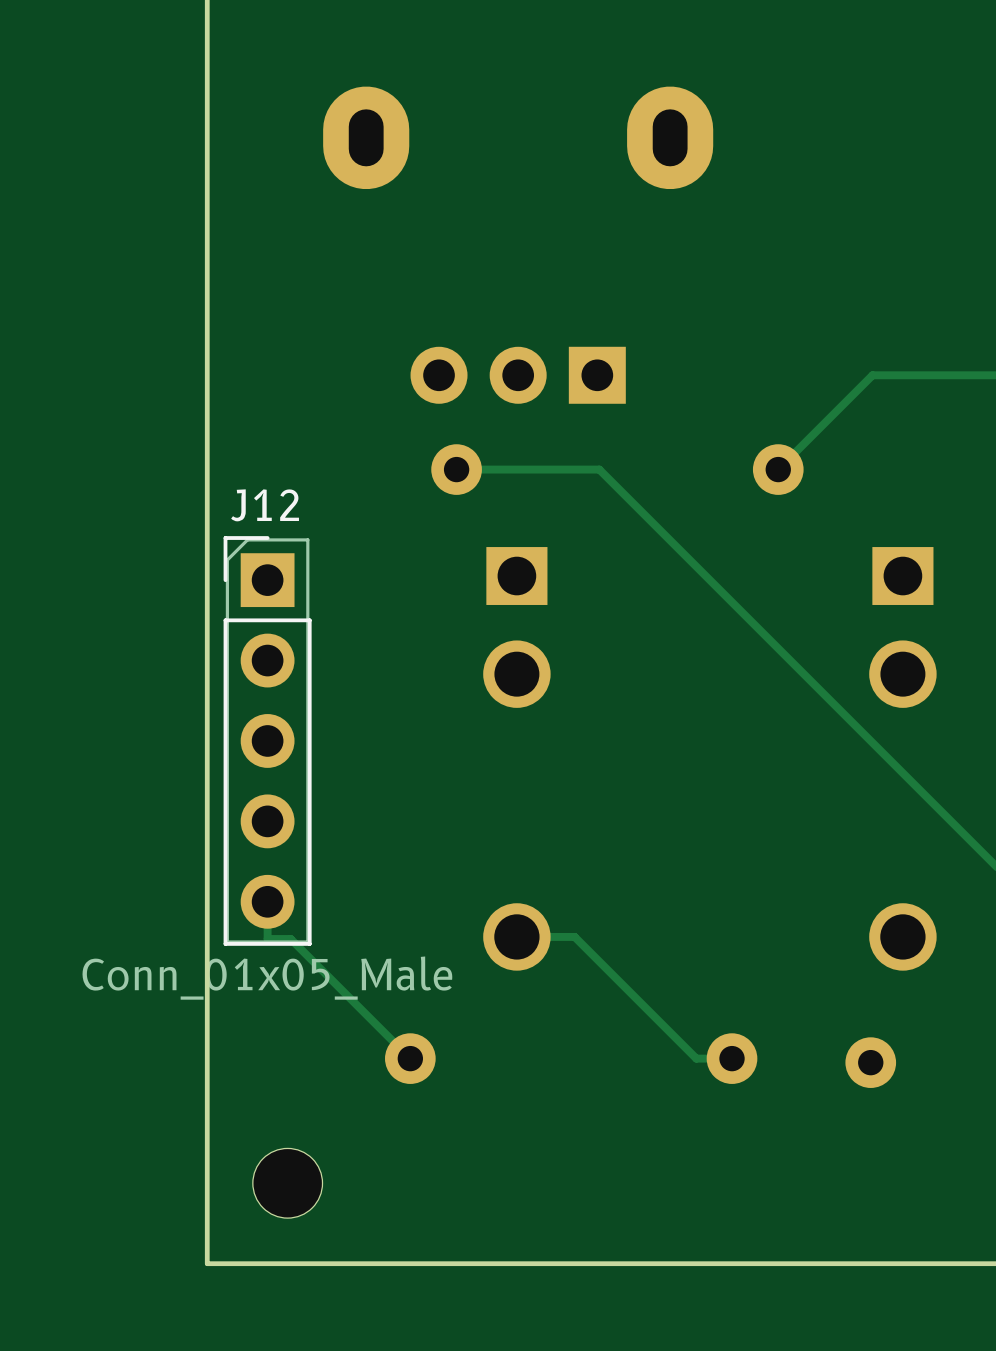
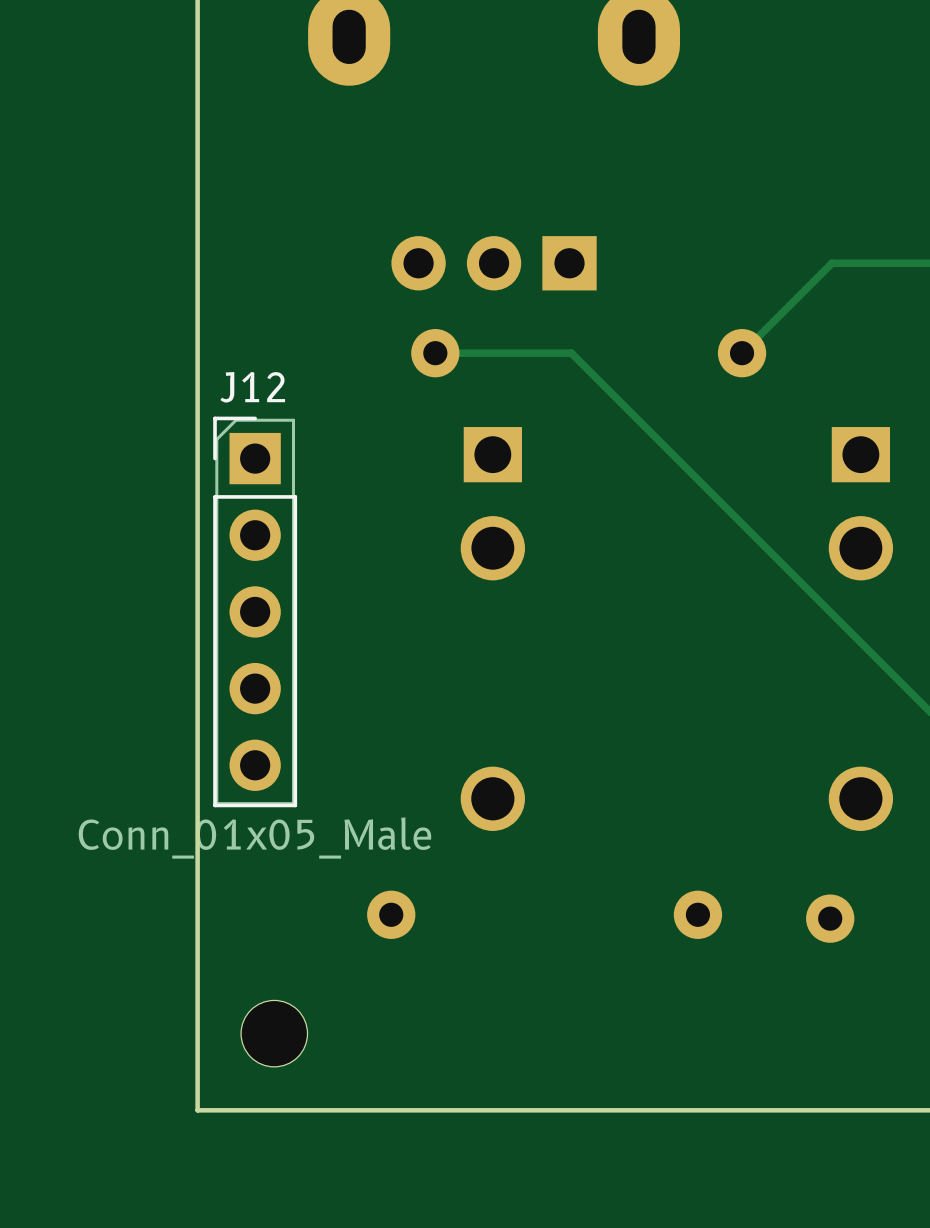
track: (267, 901) (267, 939) (290, 939) (410, 1058) -> none
track: (516, 936) (574, 936) (696, 1058) (732, 1058) -> none

